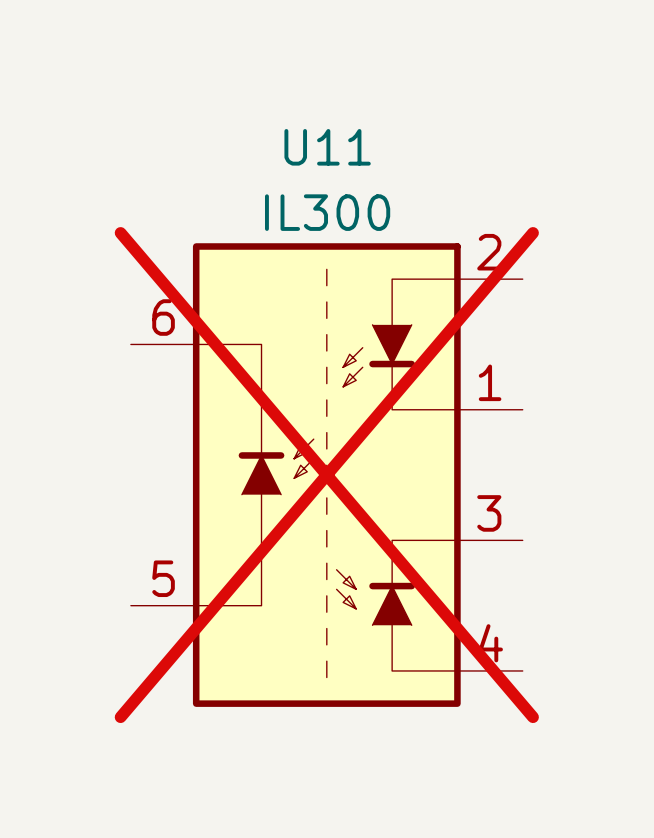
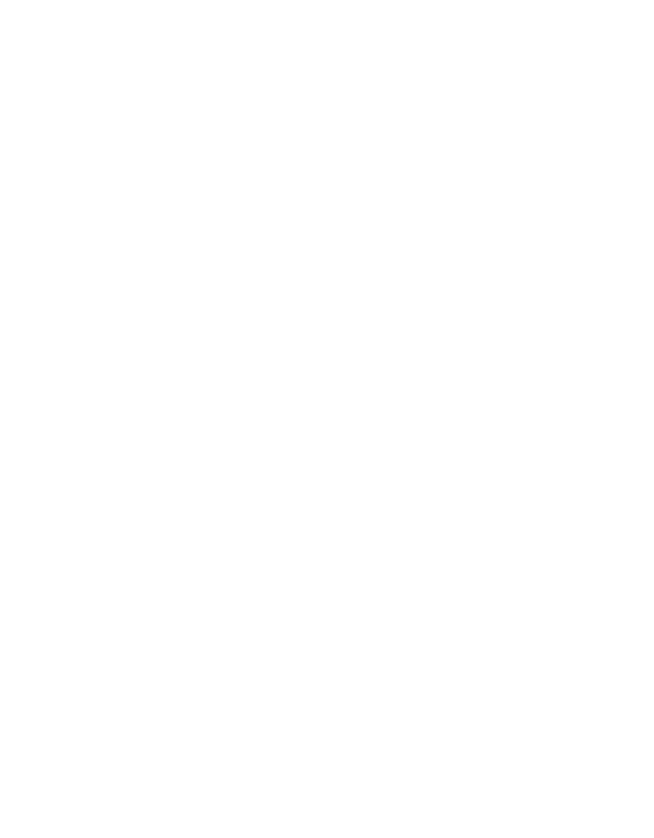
U11: IL300 (326, 475) -> none

